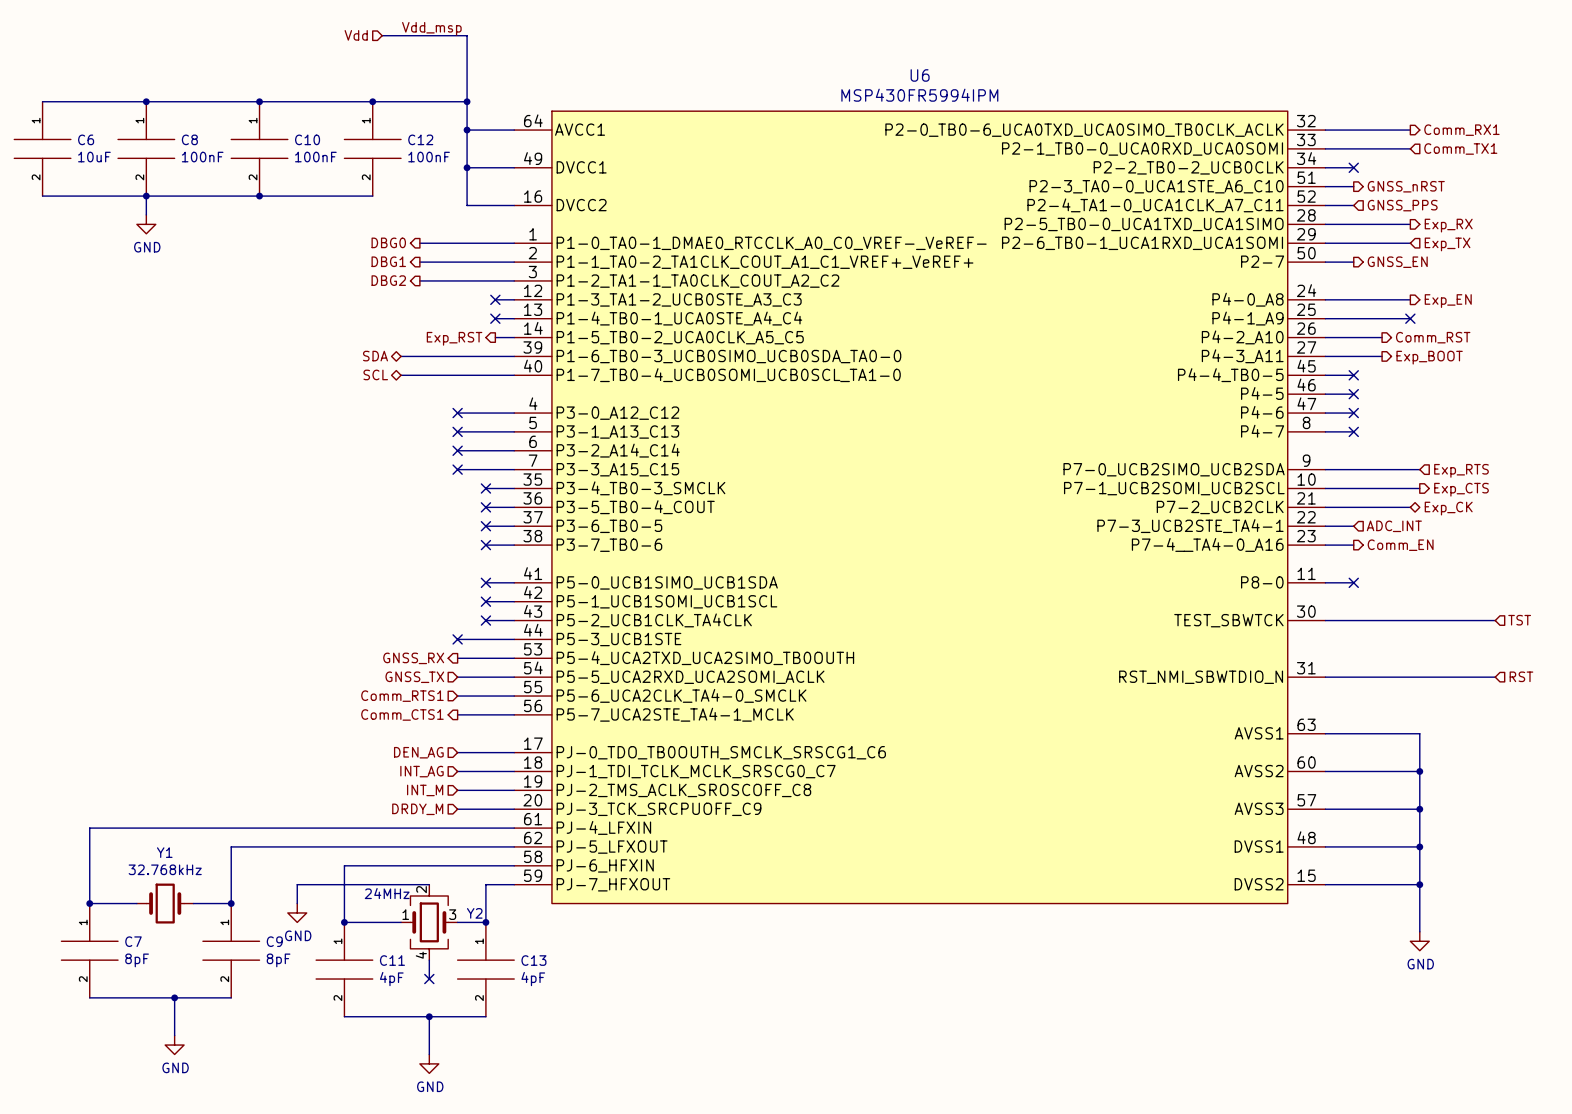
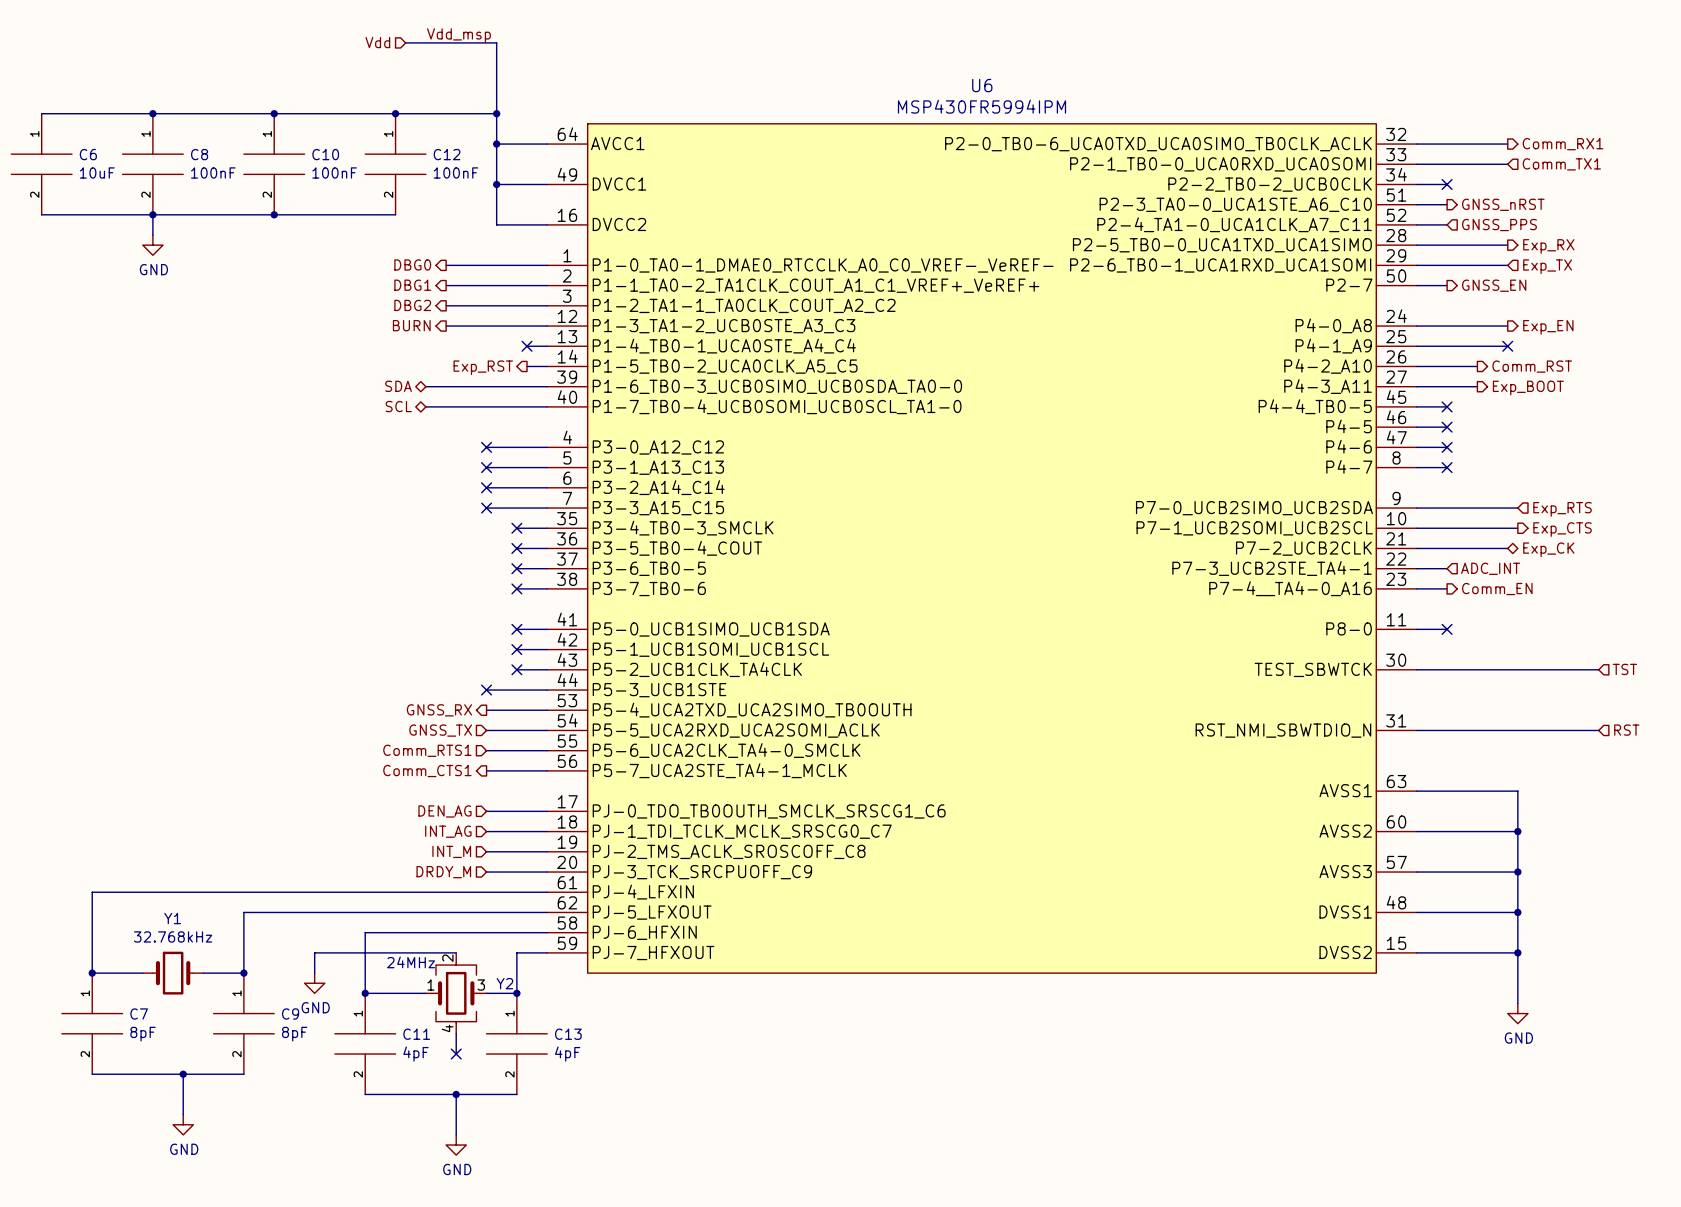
hierarchical label: none -> BURN (411, 325)
wire: none -> (446, 326) (527, 326)
no-connect mark: (495, 299) -> none

